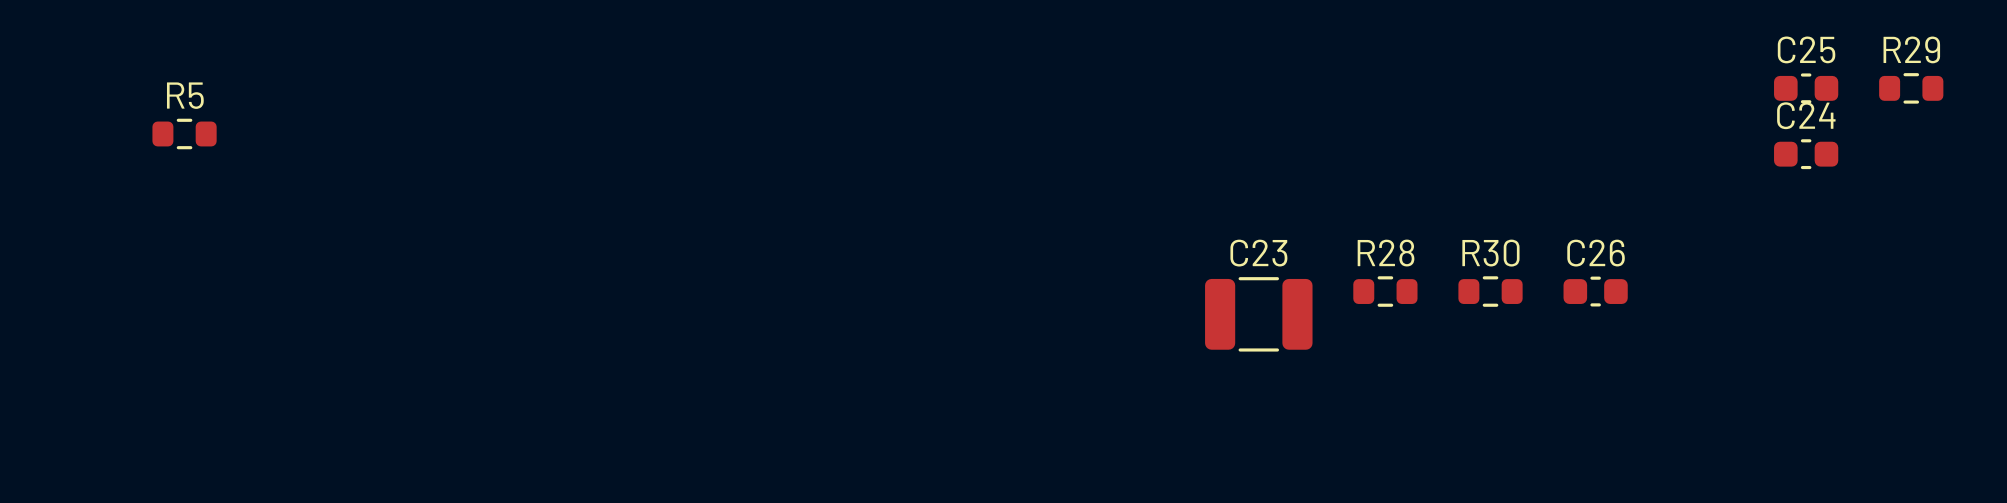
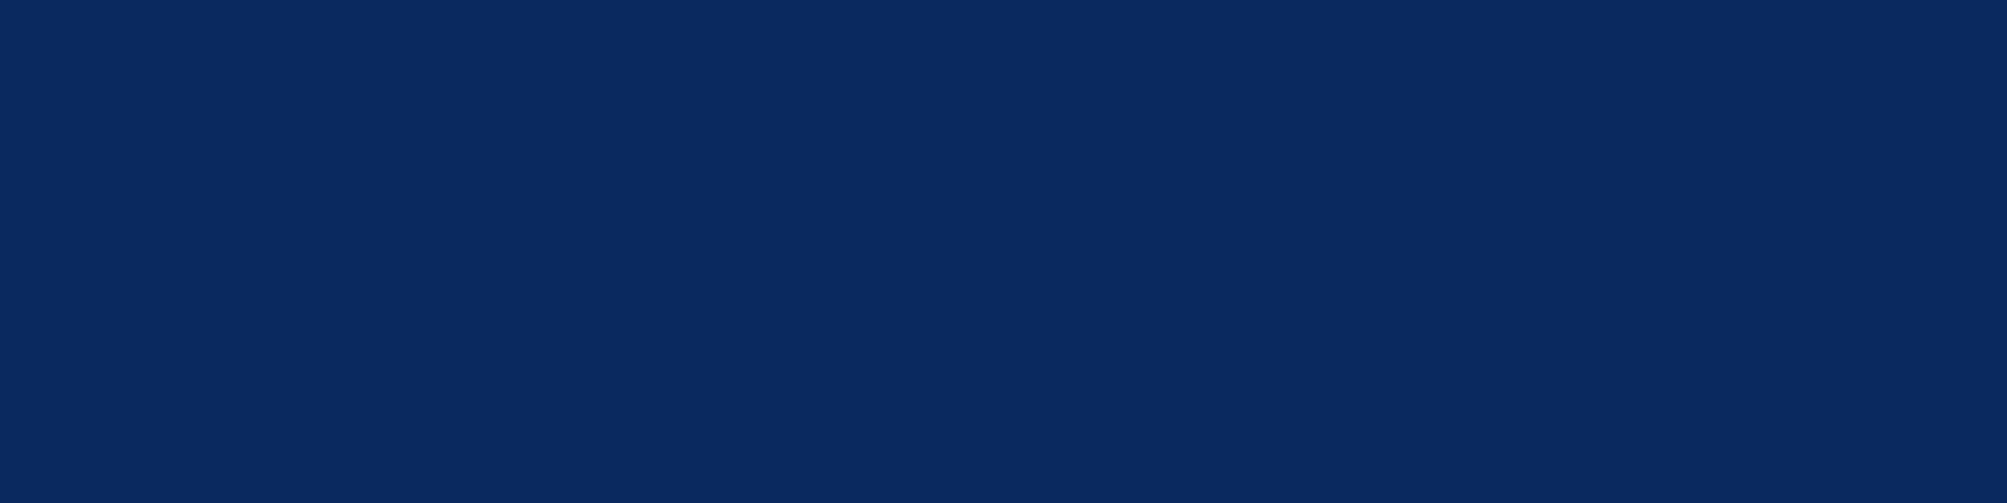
C25: (1806, 88) -> none
R29: (1911, 88) -> none
R5: (184, 133) -> none
C24: (1806, 154) -> none
R28: (1385, 291) -> none
R30: (1490, 291) -> none
C26: (1595, 291) -> none
C23: (1258, 314) -> none

